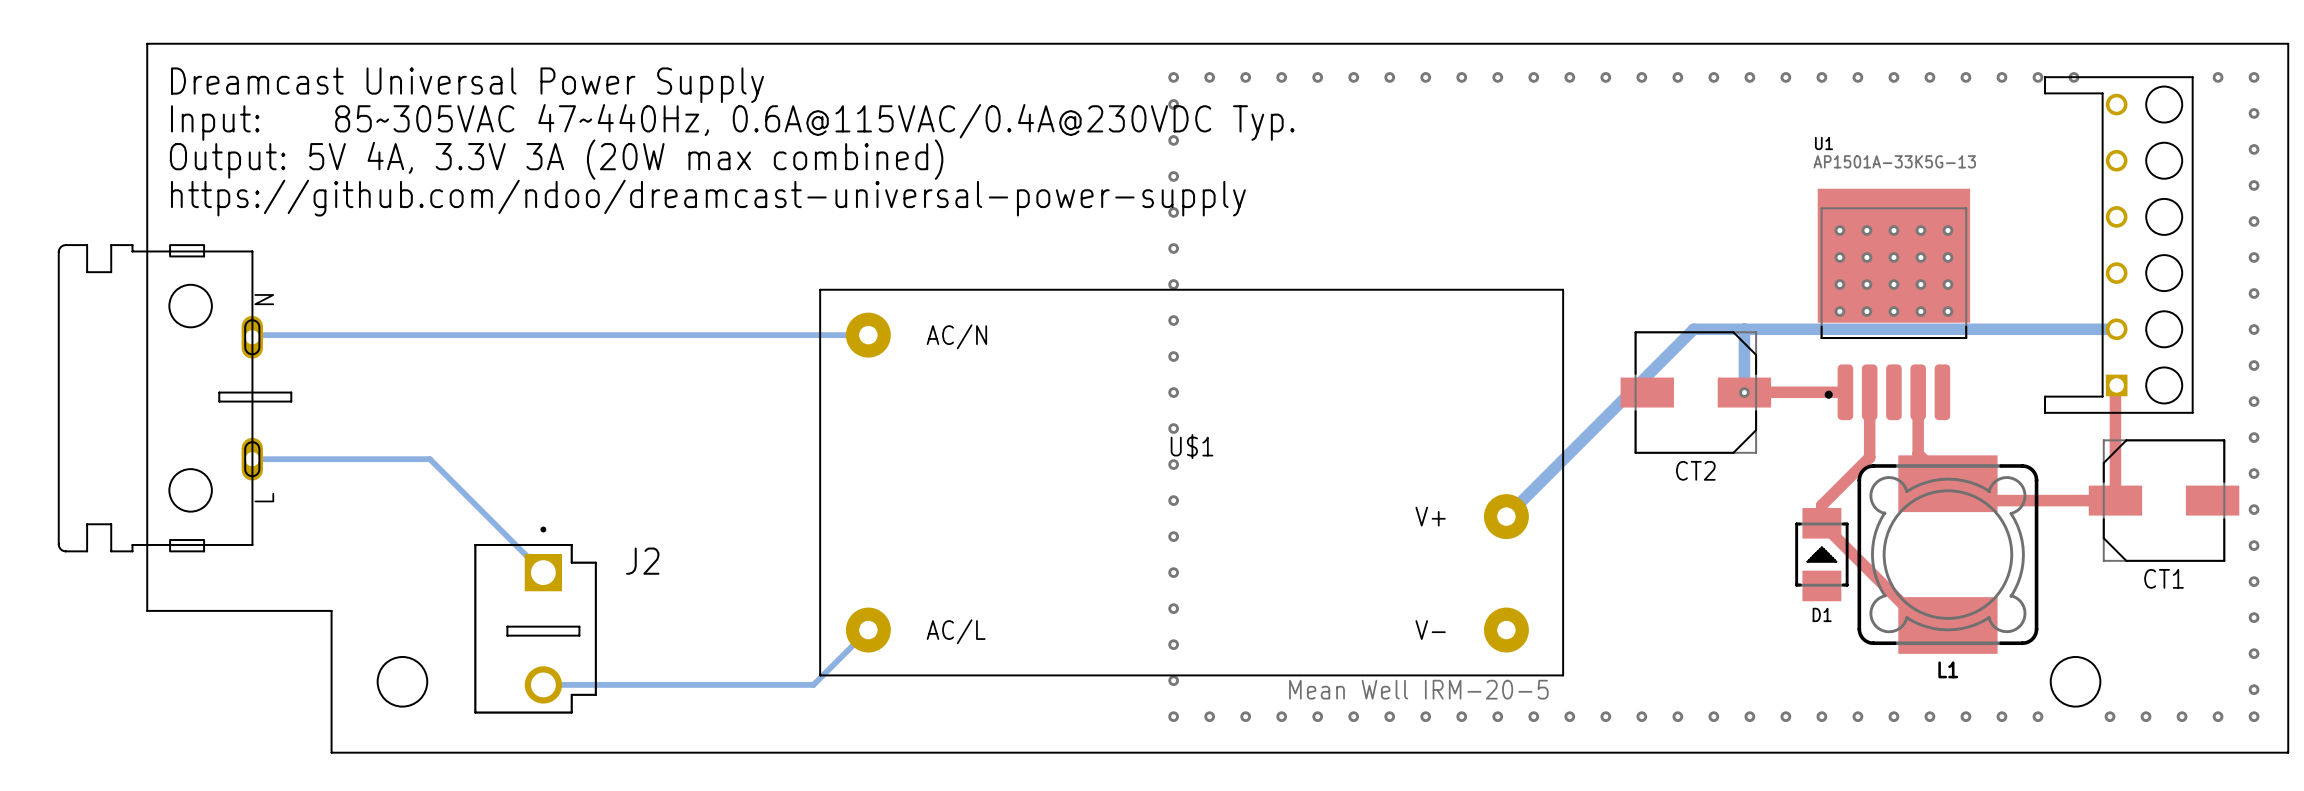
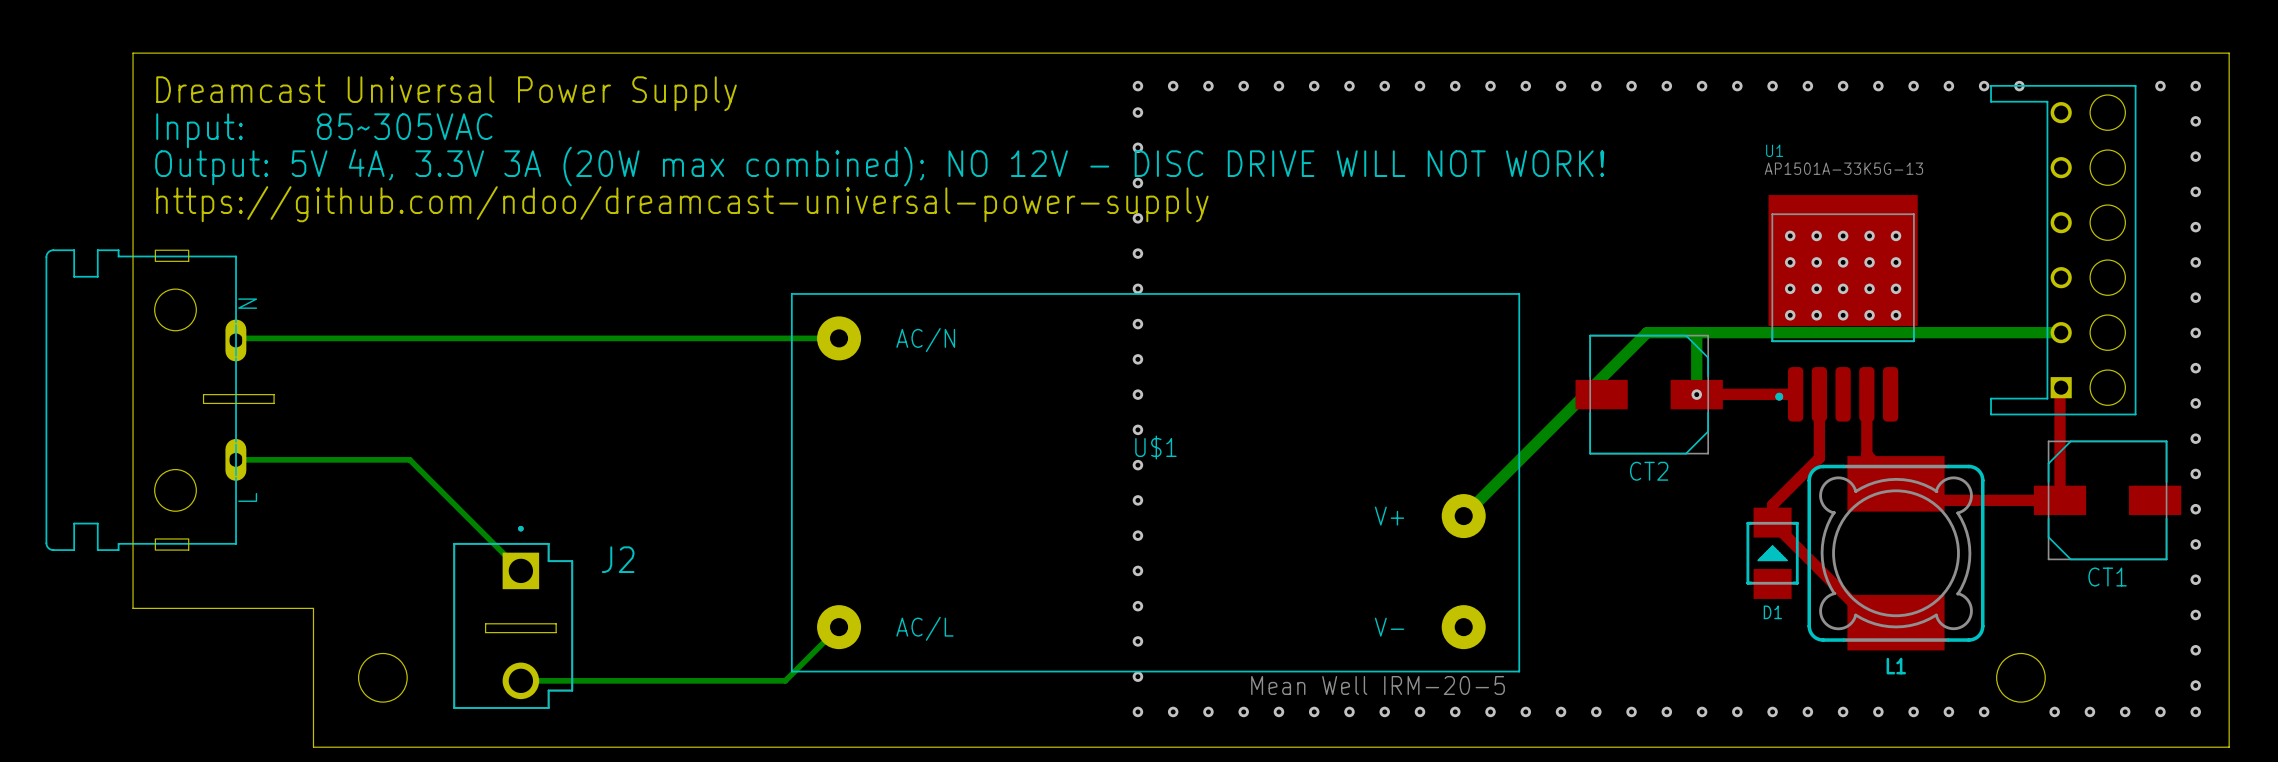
text: Input: 85~305VAC 47~440Hz, 0.6A@115VAC/0.4A@230VDC Typ. (732, 122) -> Input: 85~305VAC (324, 130)
text: Output: 5V 4A, 3.3V 3A (20W max combined) (556, 159) -> Output: 5V 4A, 3.3V 3A (20W max combined); NO 12V - DISC DRIVE WILL NOT WORK! (879, 166)

